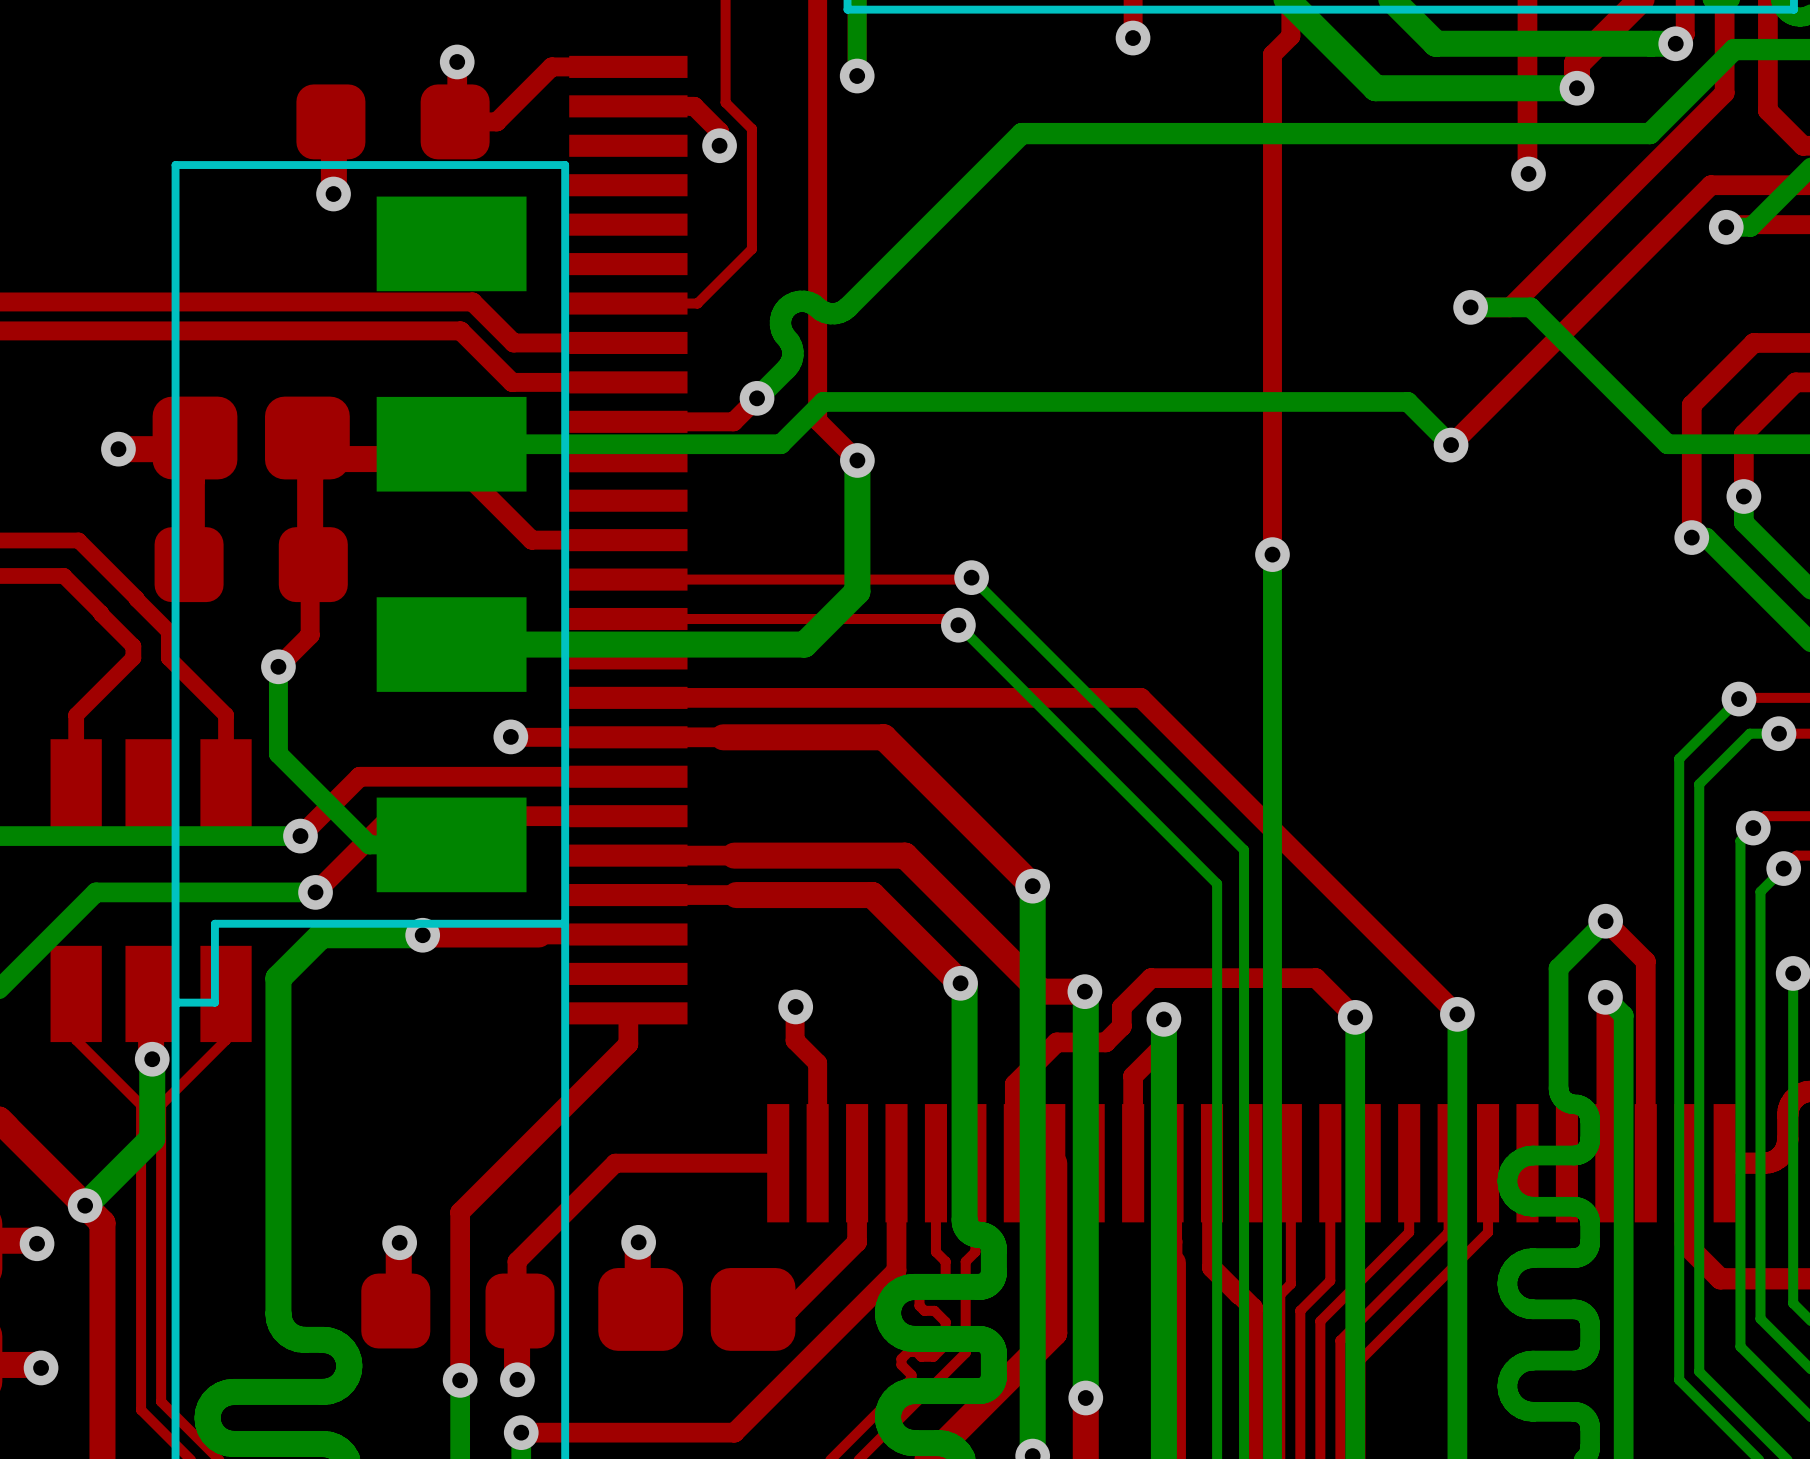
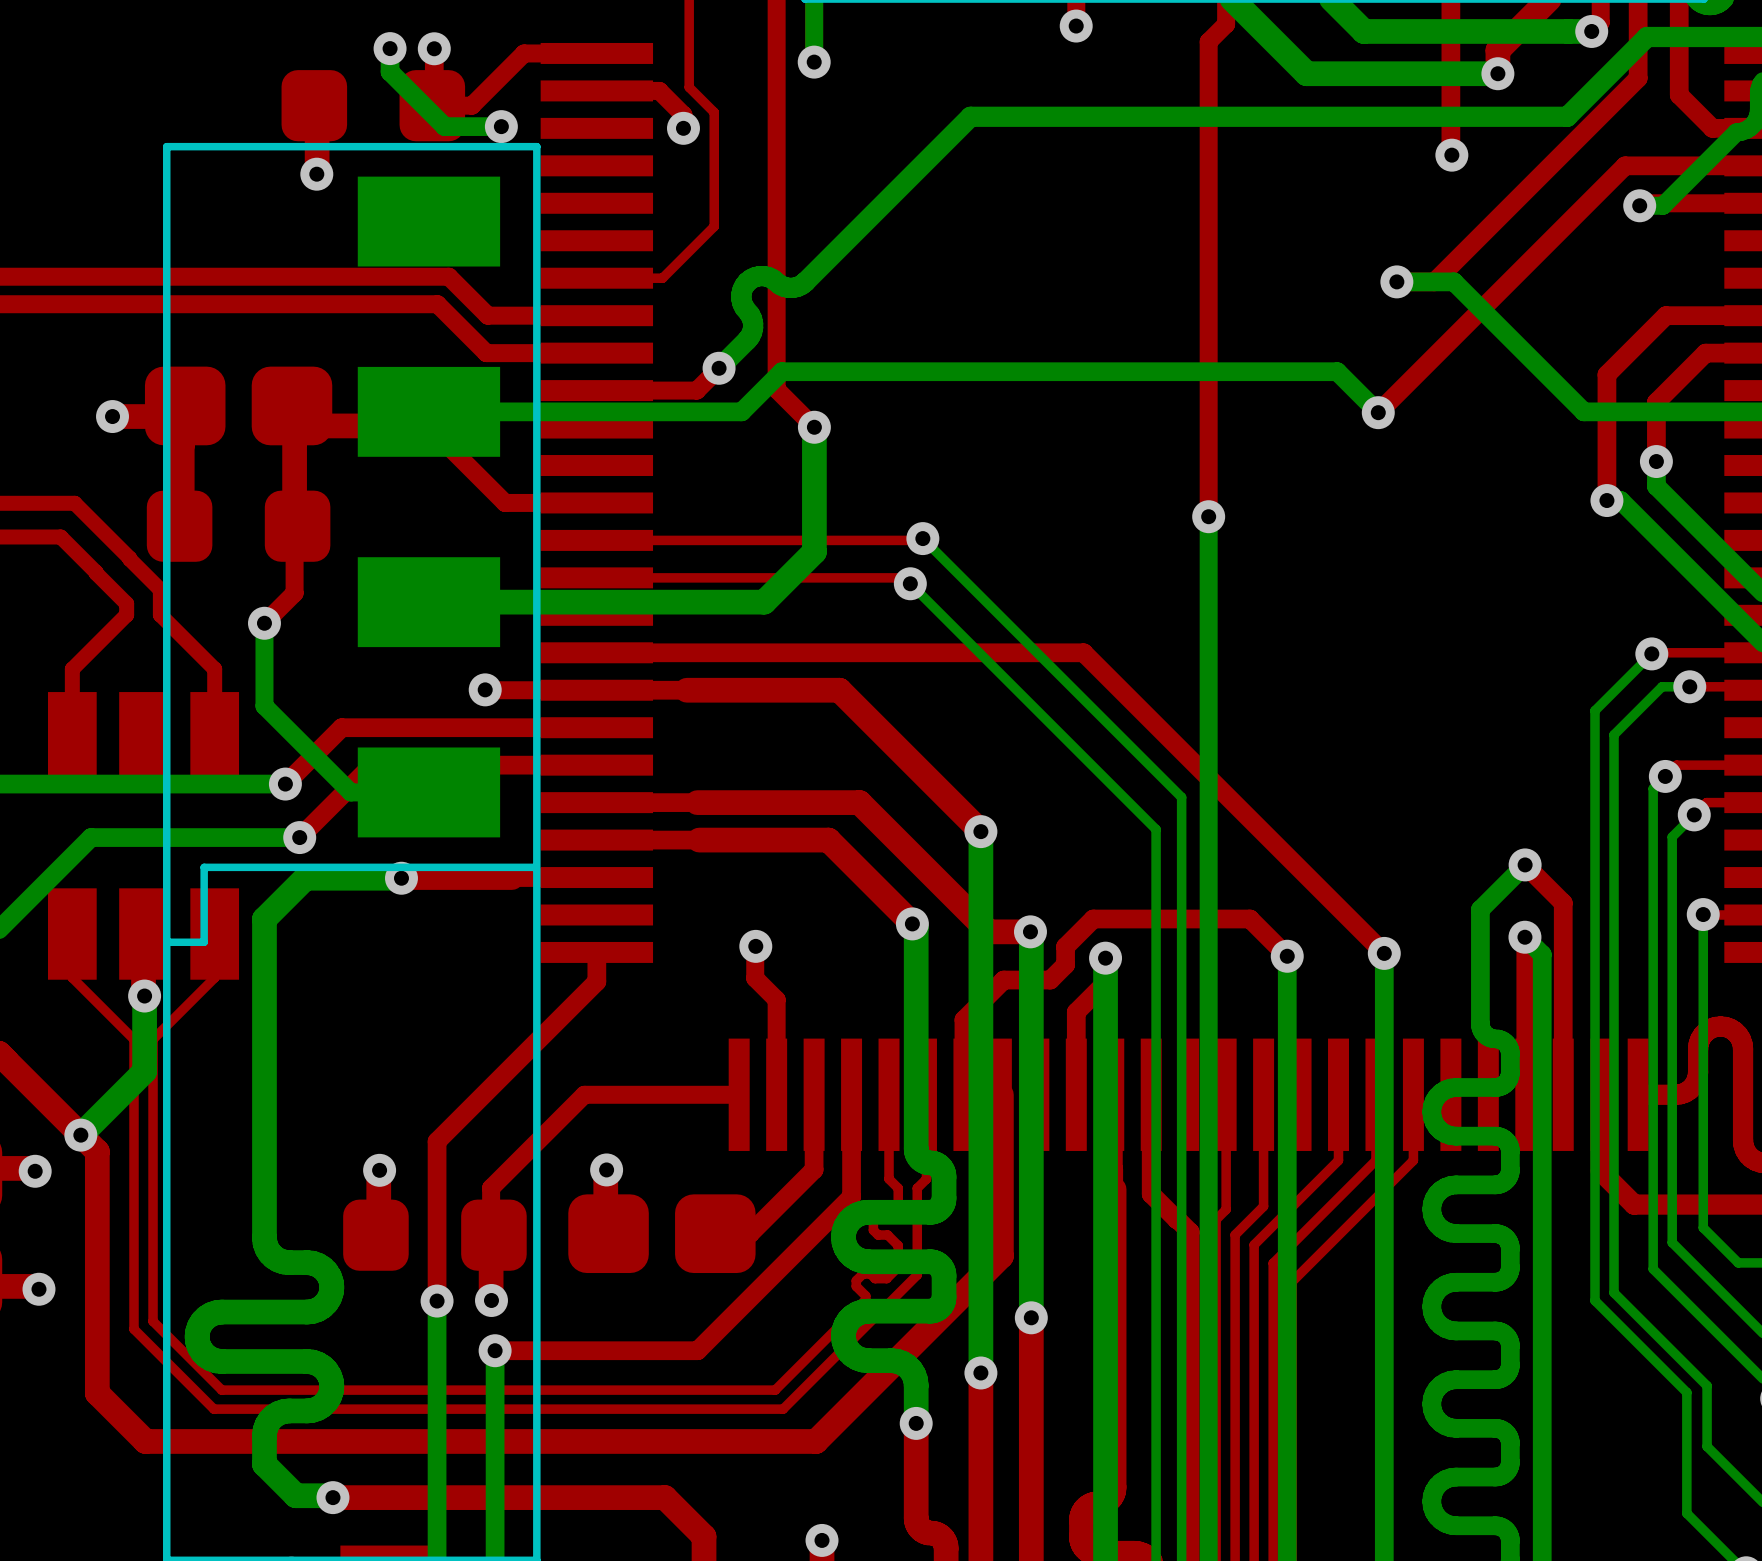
bottom track: none -> (390, 48) (390, 71) (444, 126) (501, 126)
via: none -> (390, 48)
via: none -> (501, 126)

